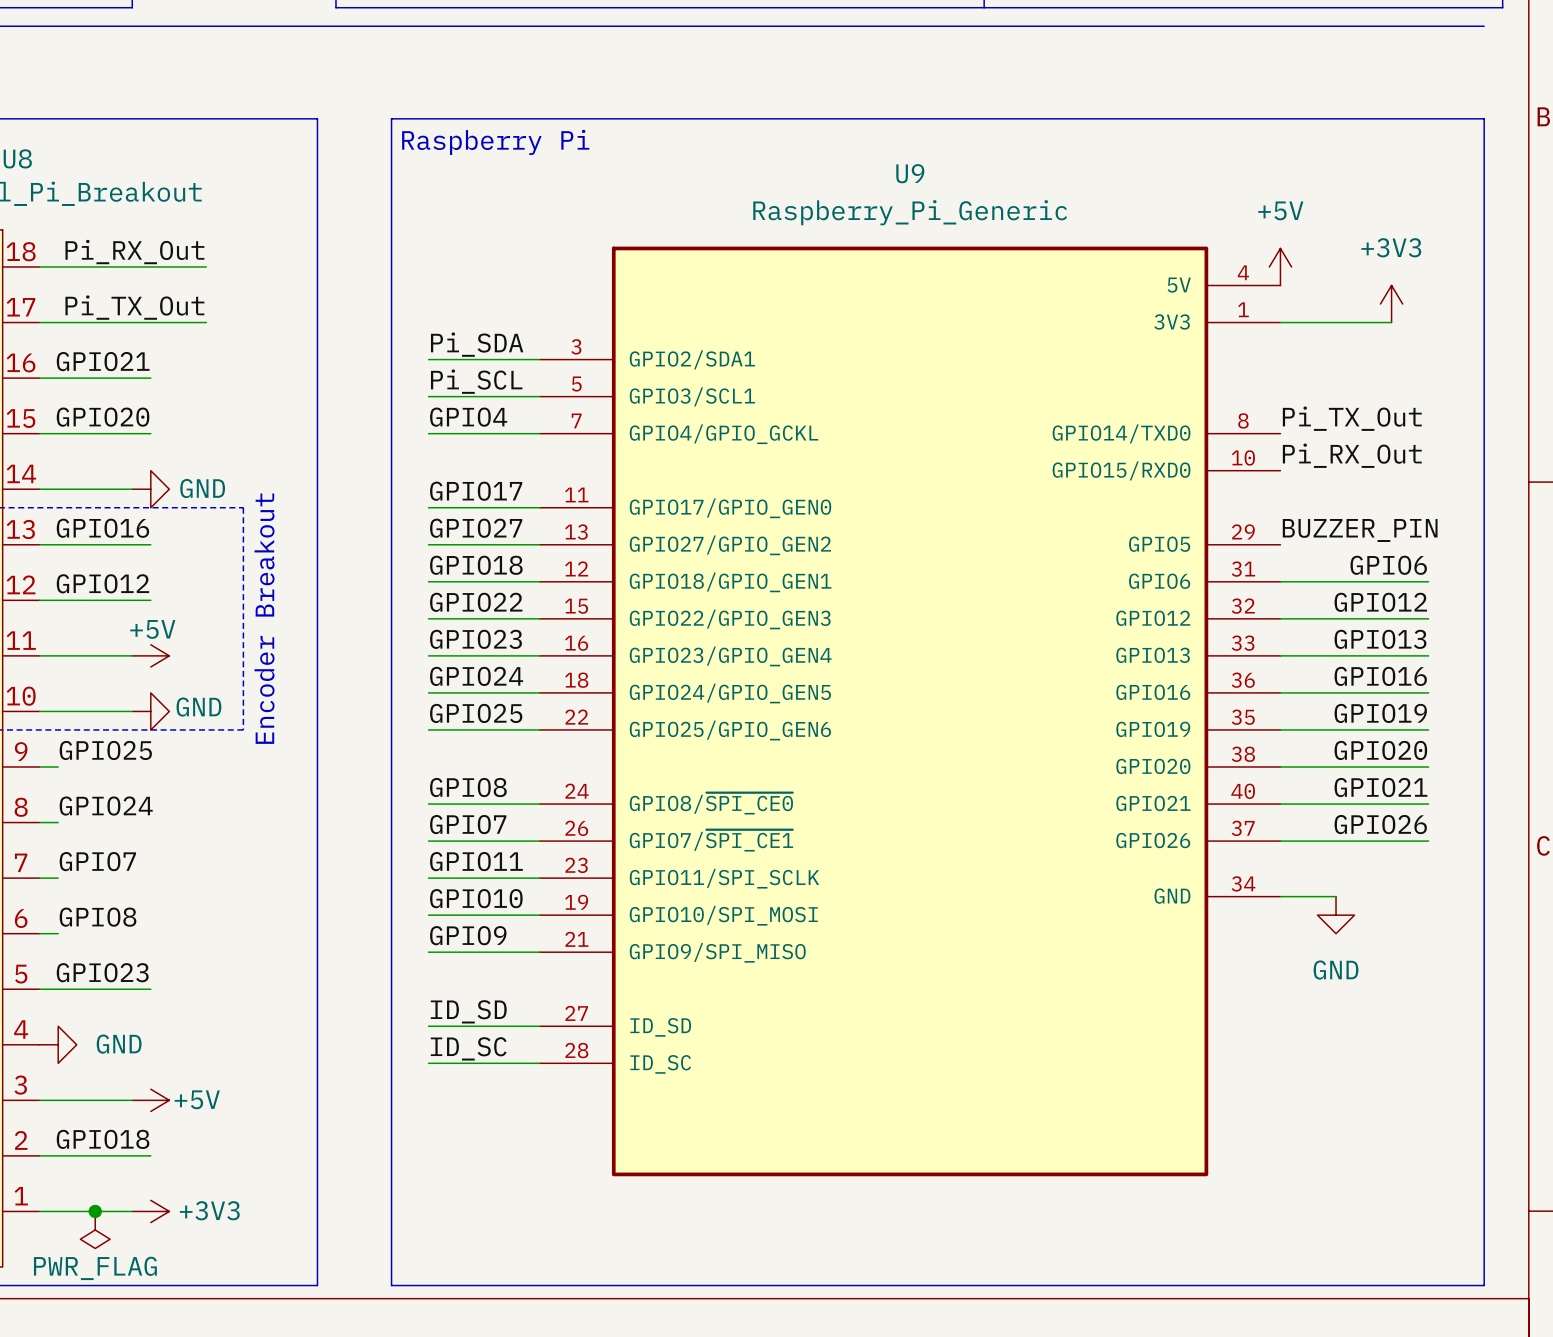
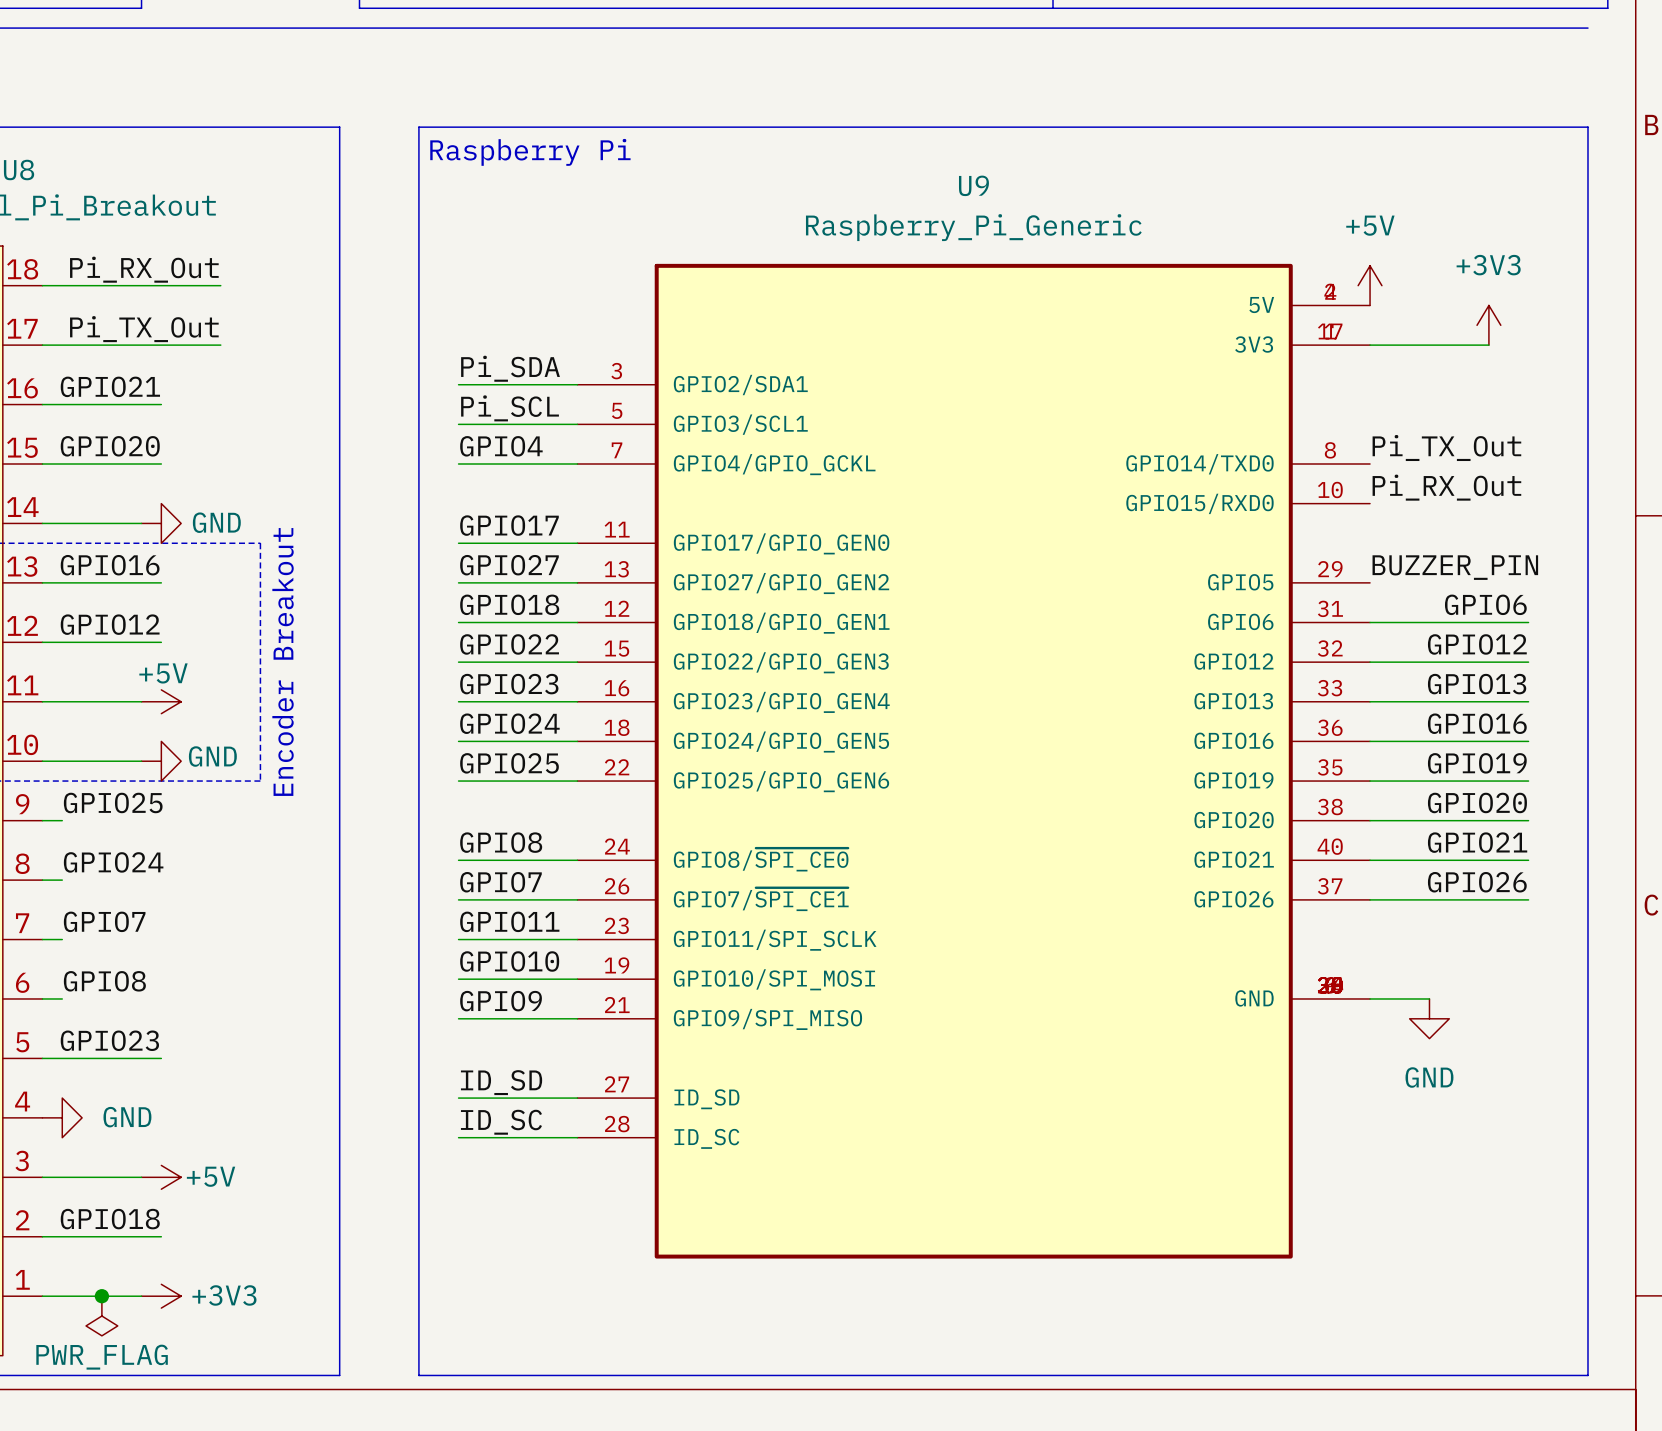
U9 symbol: [539, 246, 1281, 1177] -> [577, 263, 1371, 1259]
wire: (1280, 896) (1336, 896) -> (1370, 998) (1429, 998)
power symbol position: GND (1336, 915) -> GND (1429, 1018)

